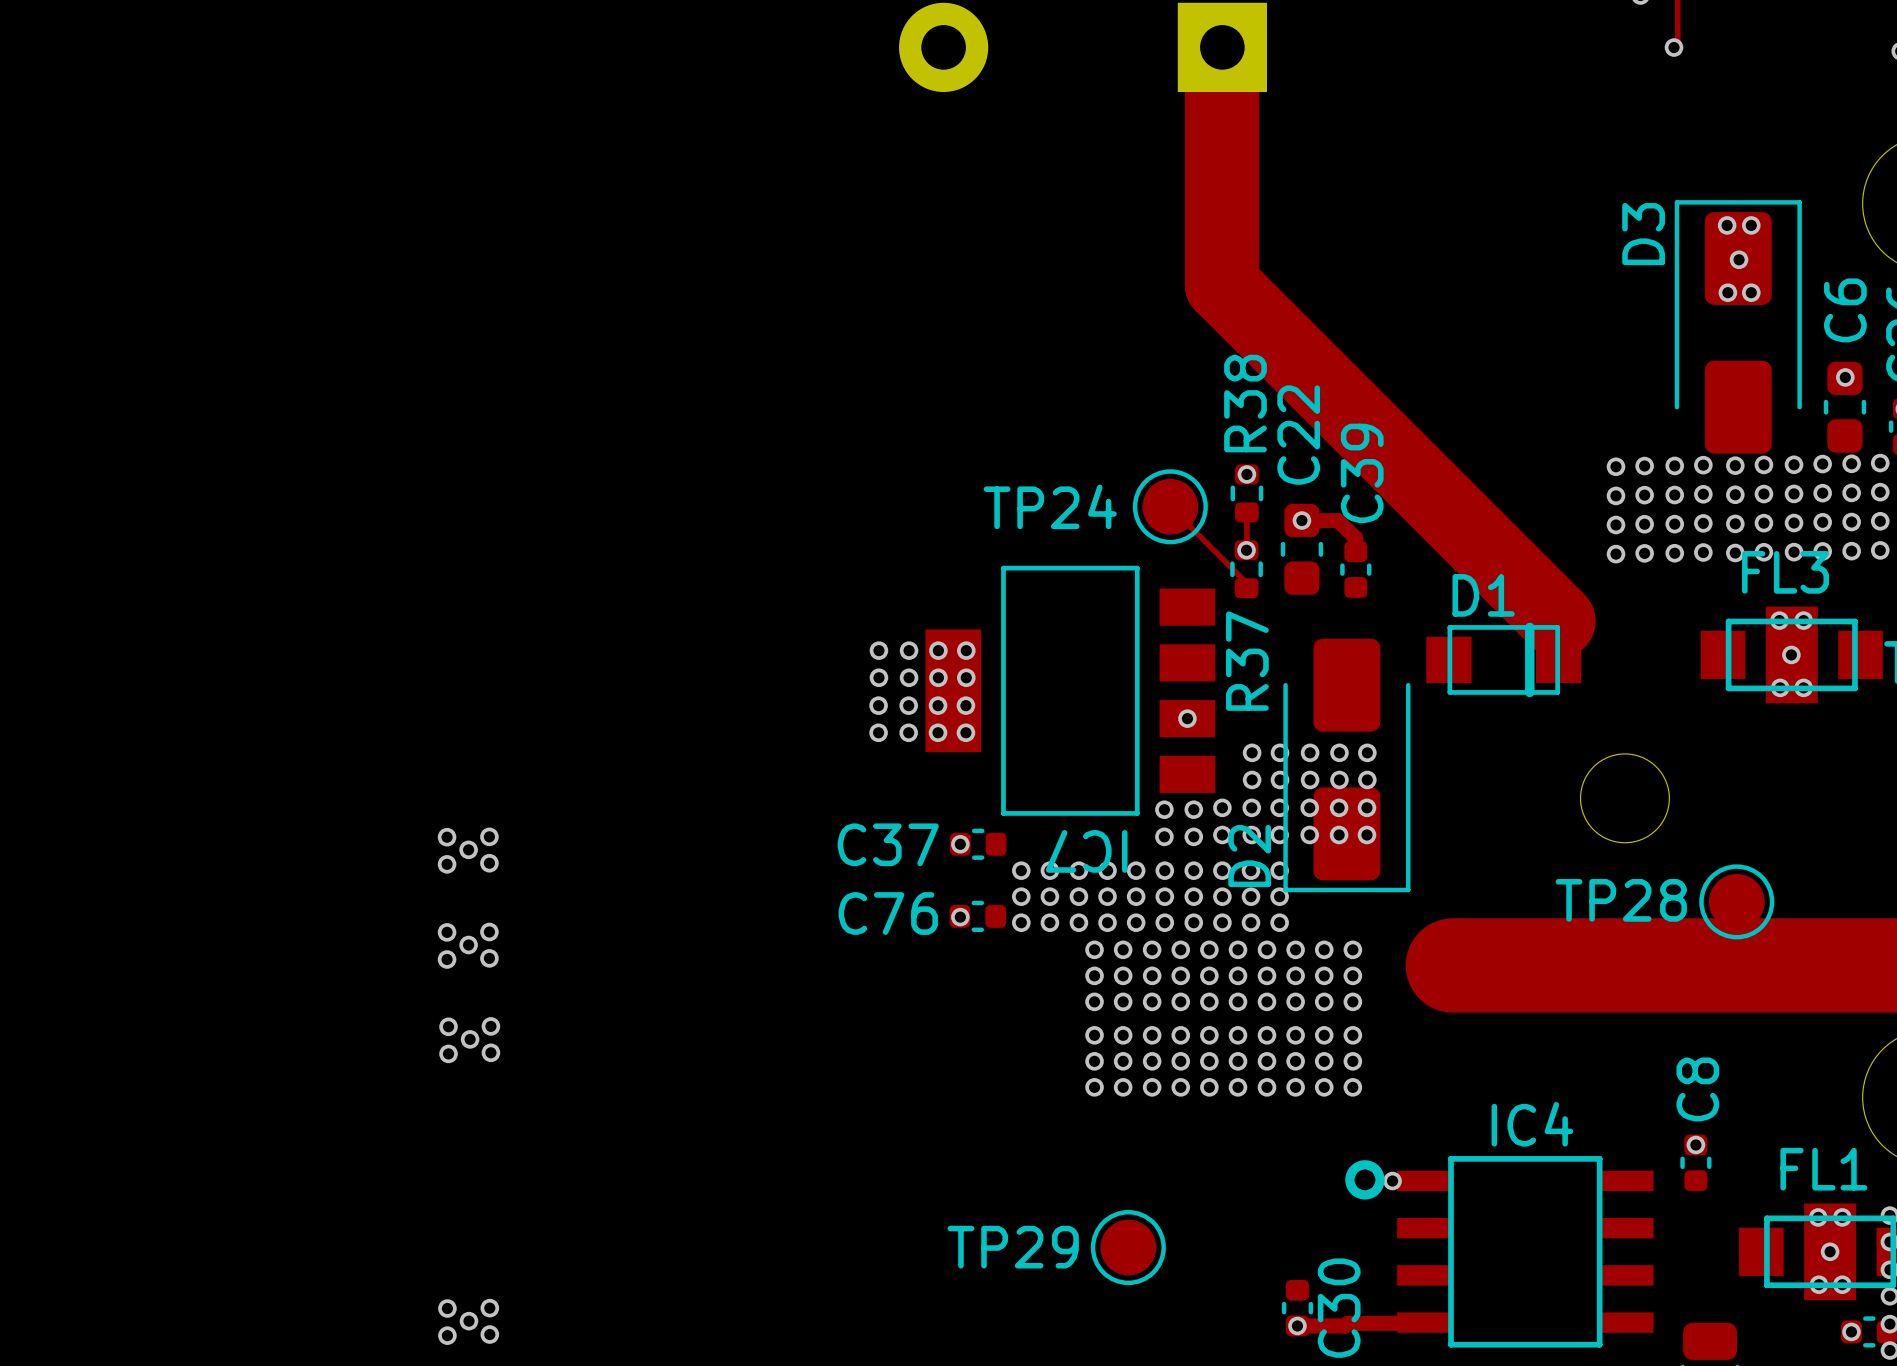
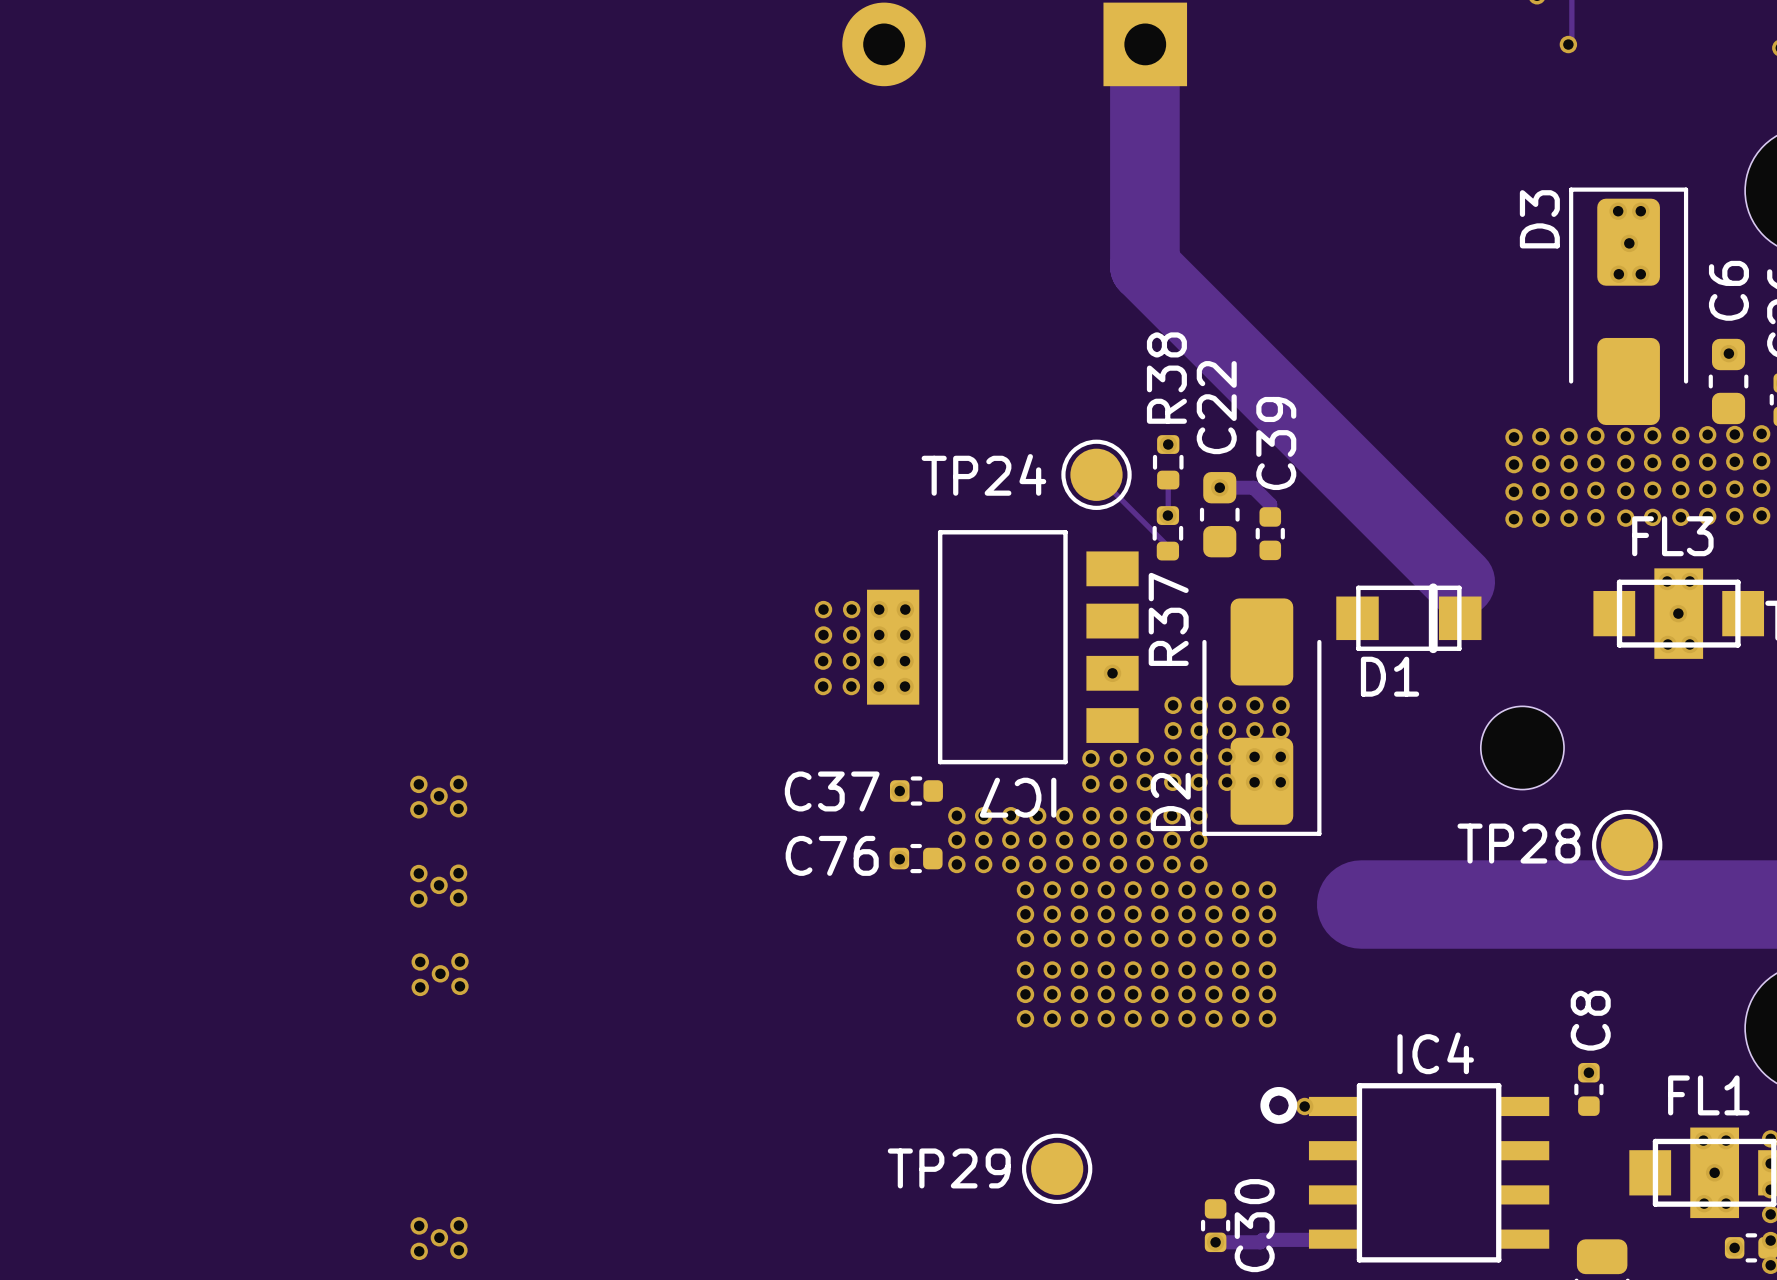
D1 name position: D1 (1483, 595) -> D1 (1390, 676)

